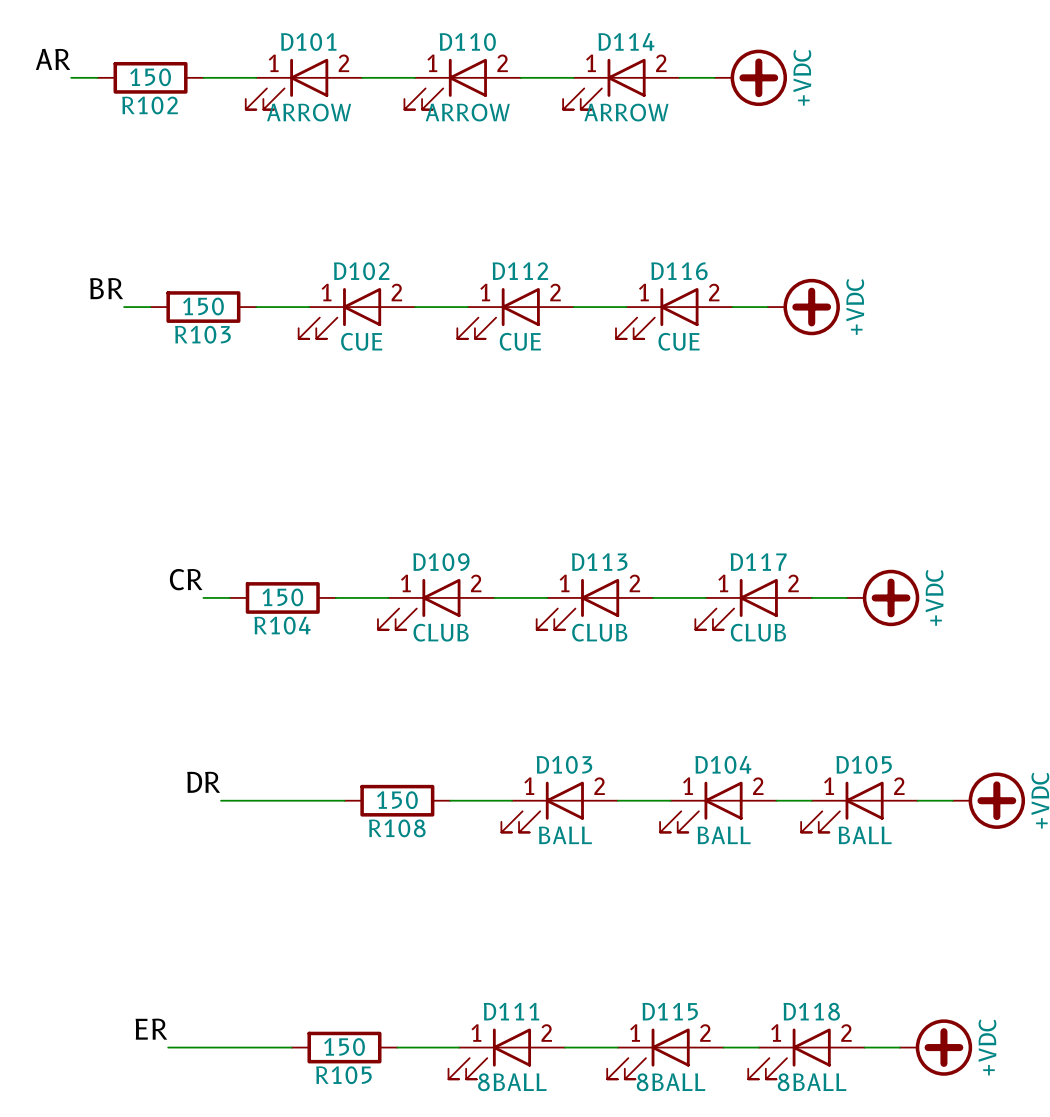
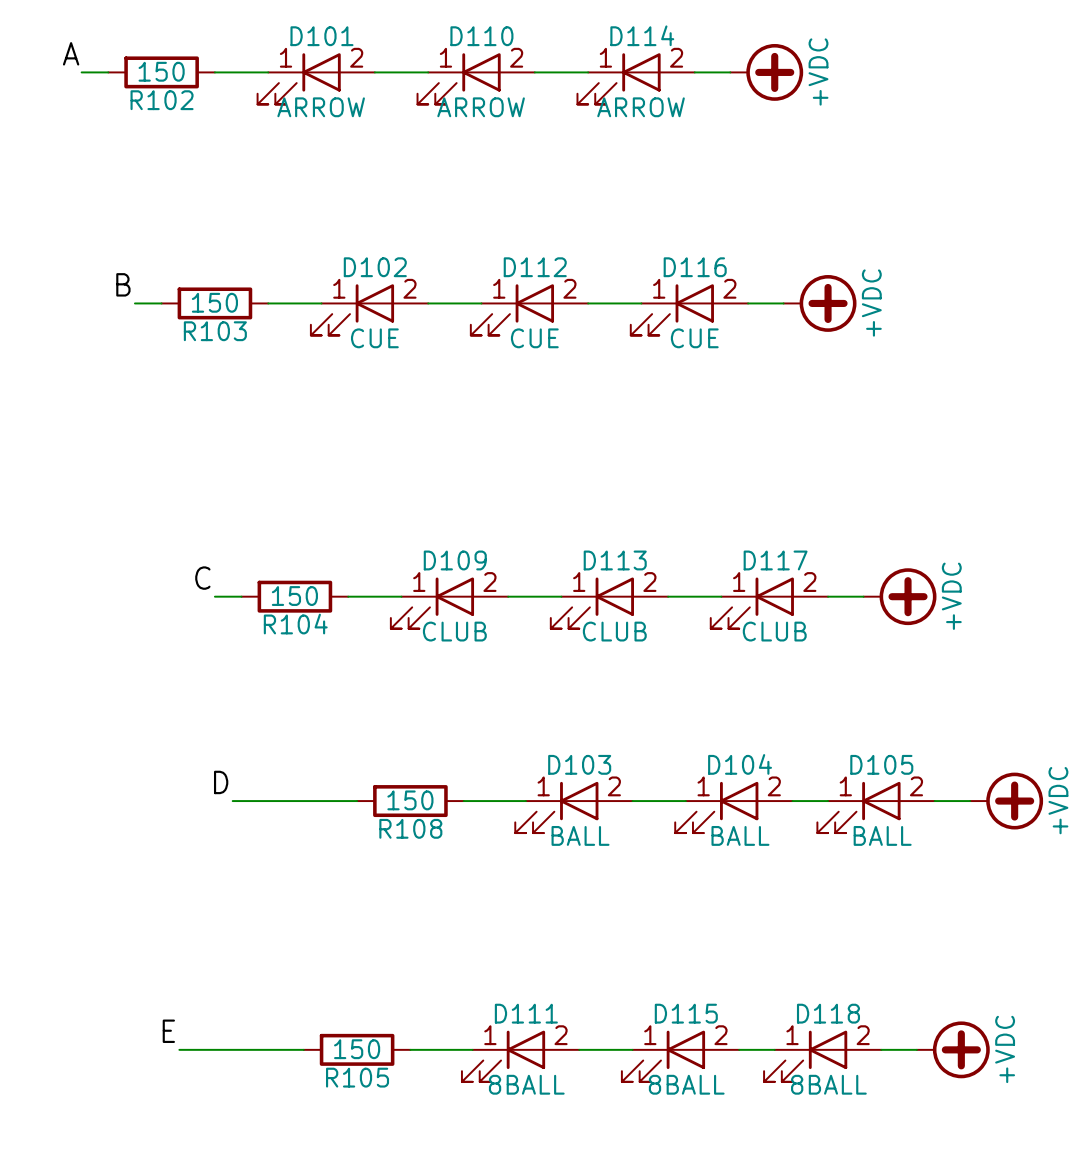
label: AR (53, 59) -> A (71, 53)
label: BR (106, 288) -> B (123, 284)
label: CR (186, 579) -> C (202, 578)
label: DR (203, 782) -> D (221, 782)
label: ER (151, 1029) -> E (168, 1031)

